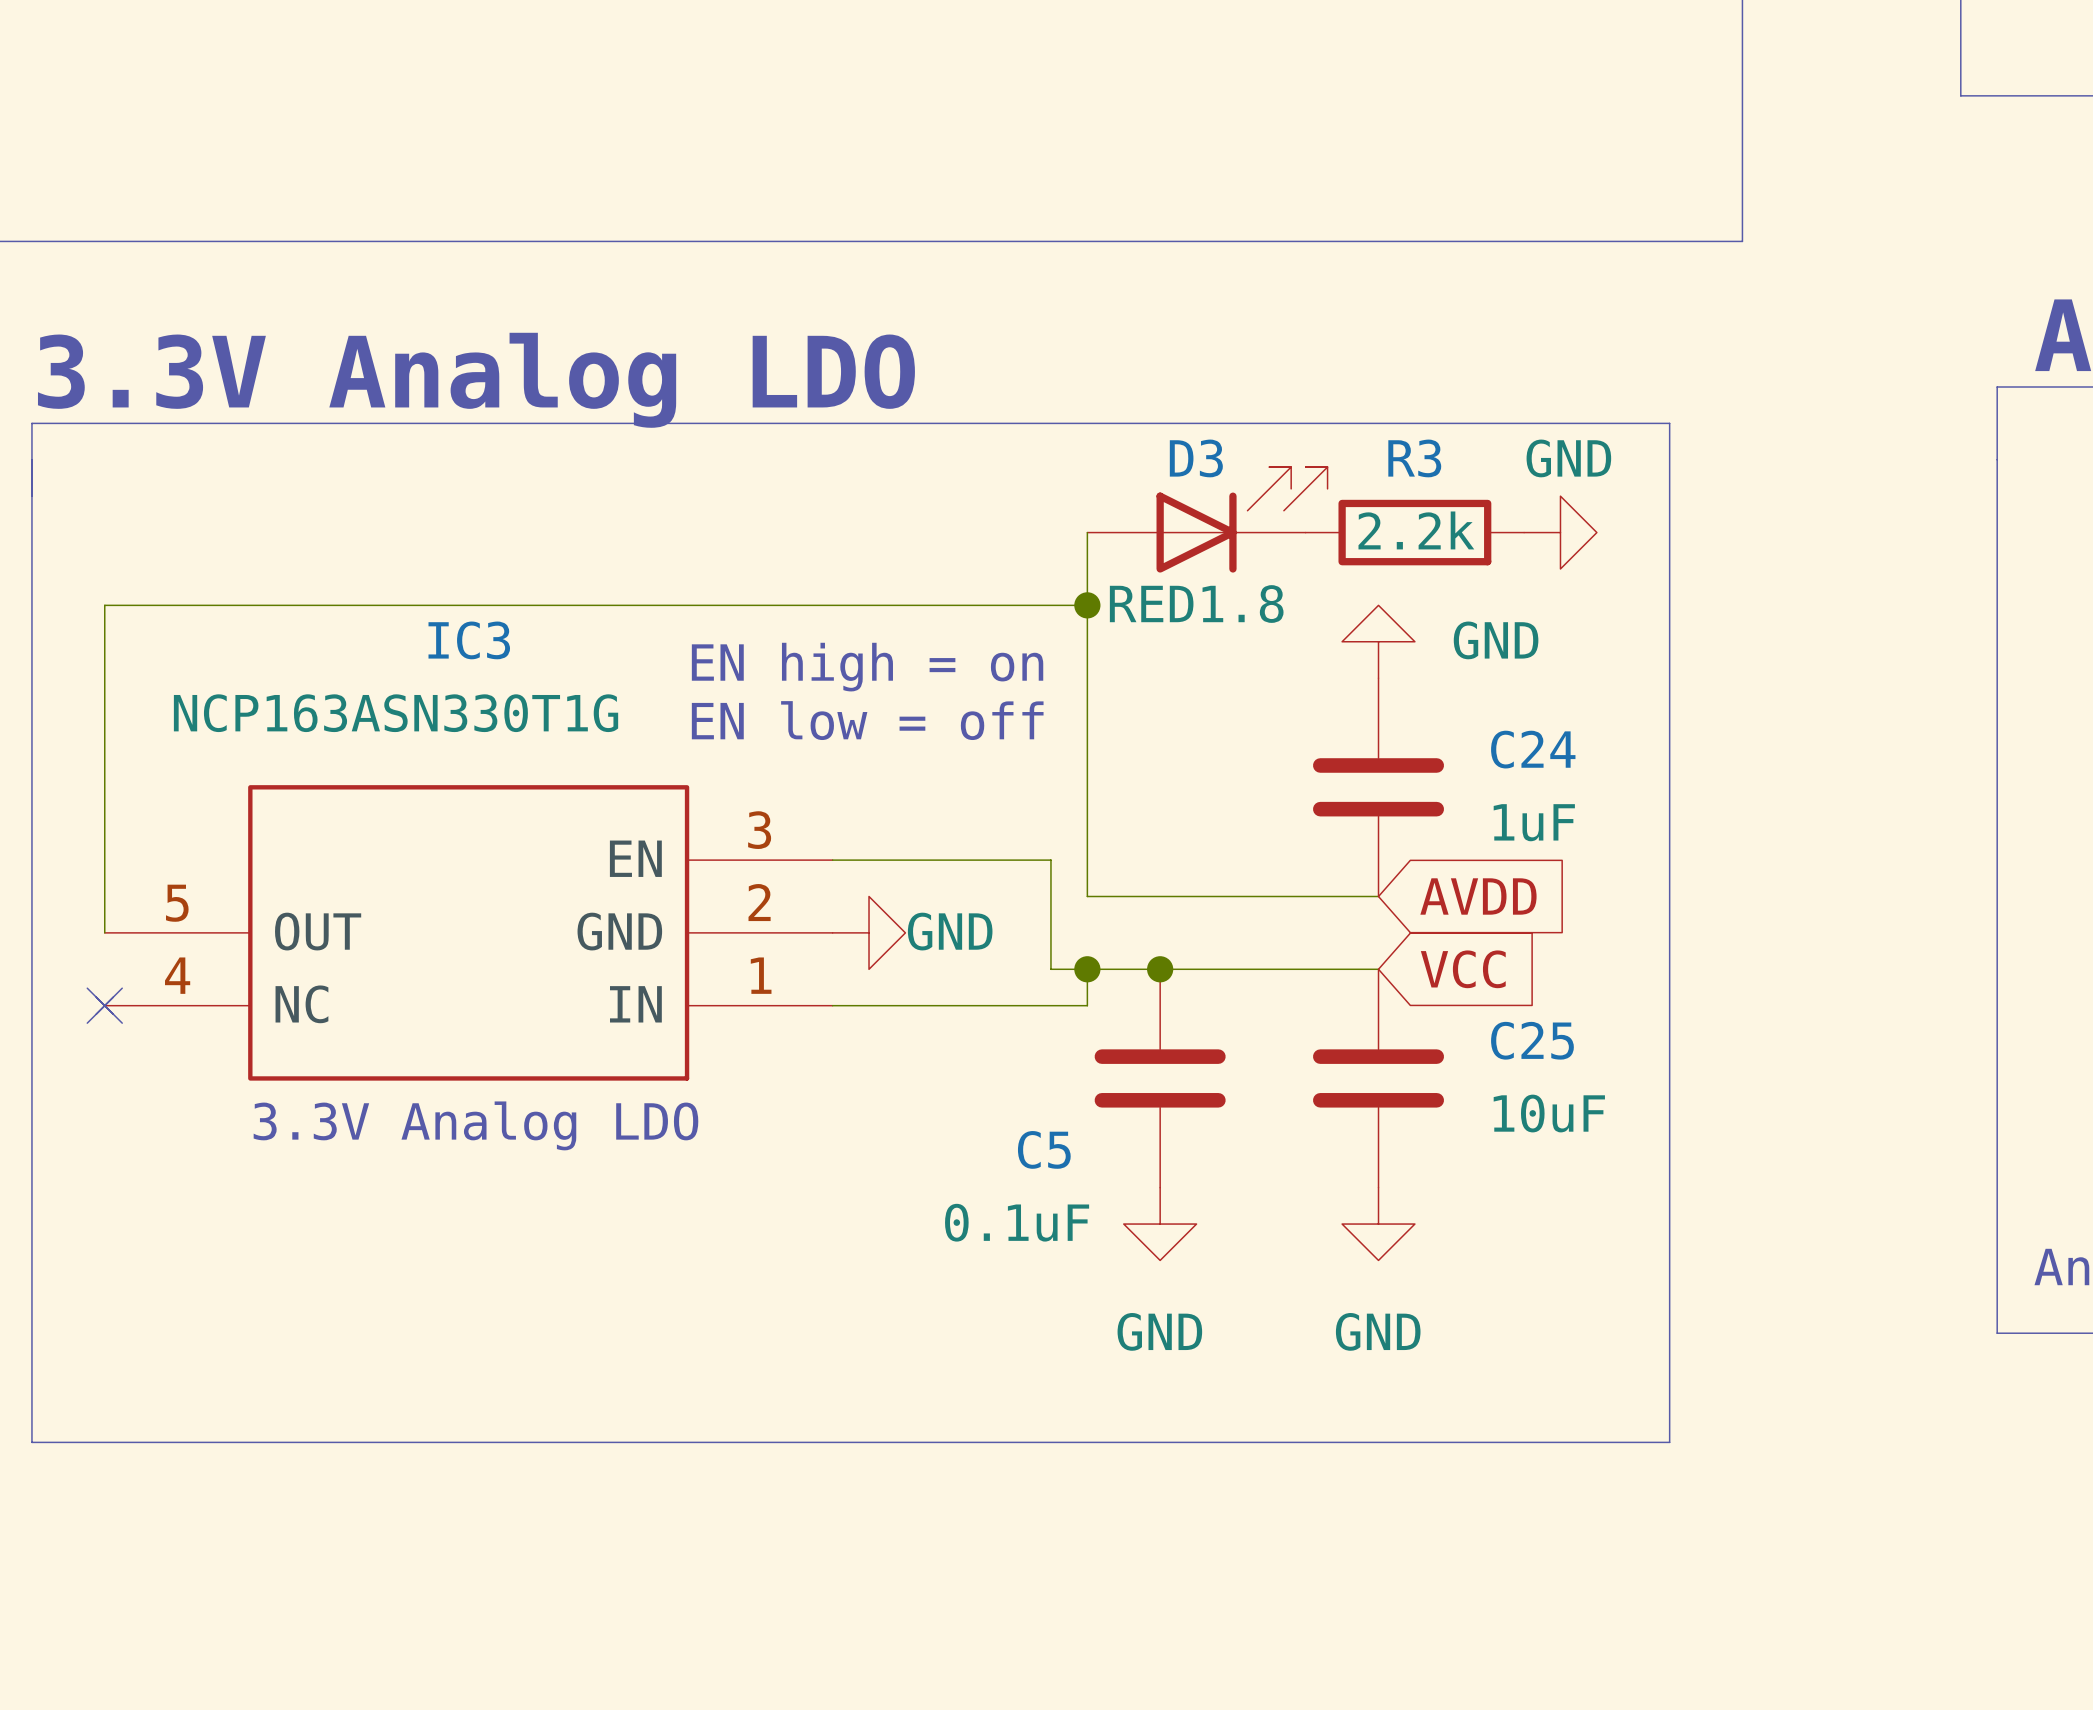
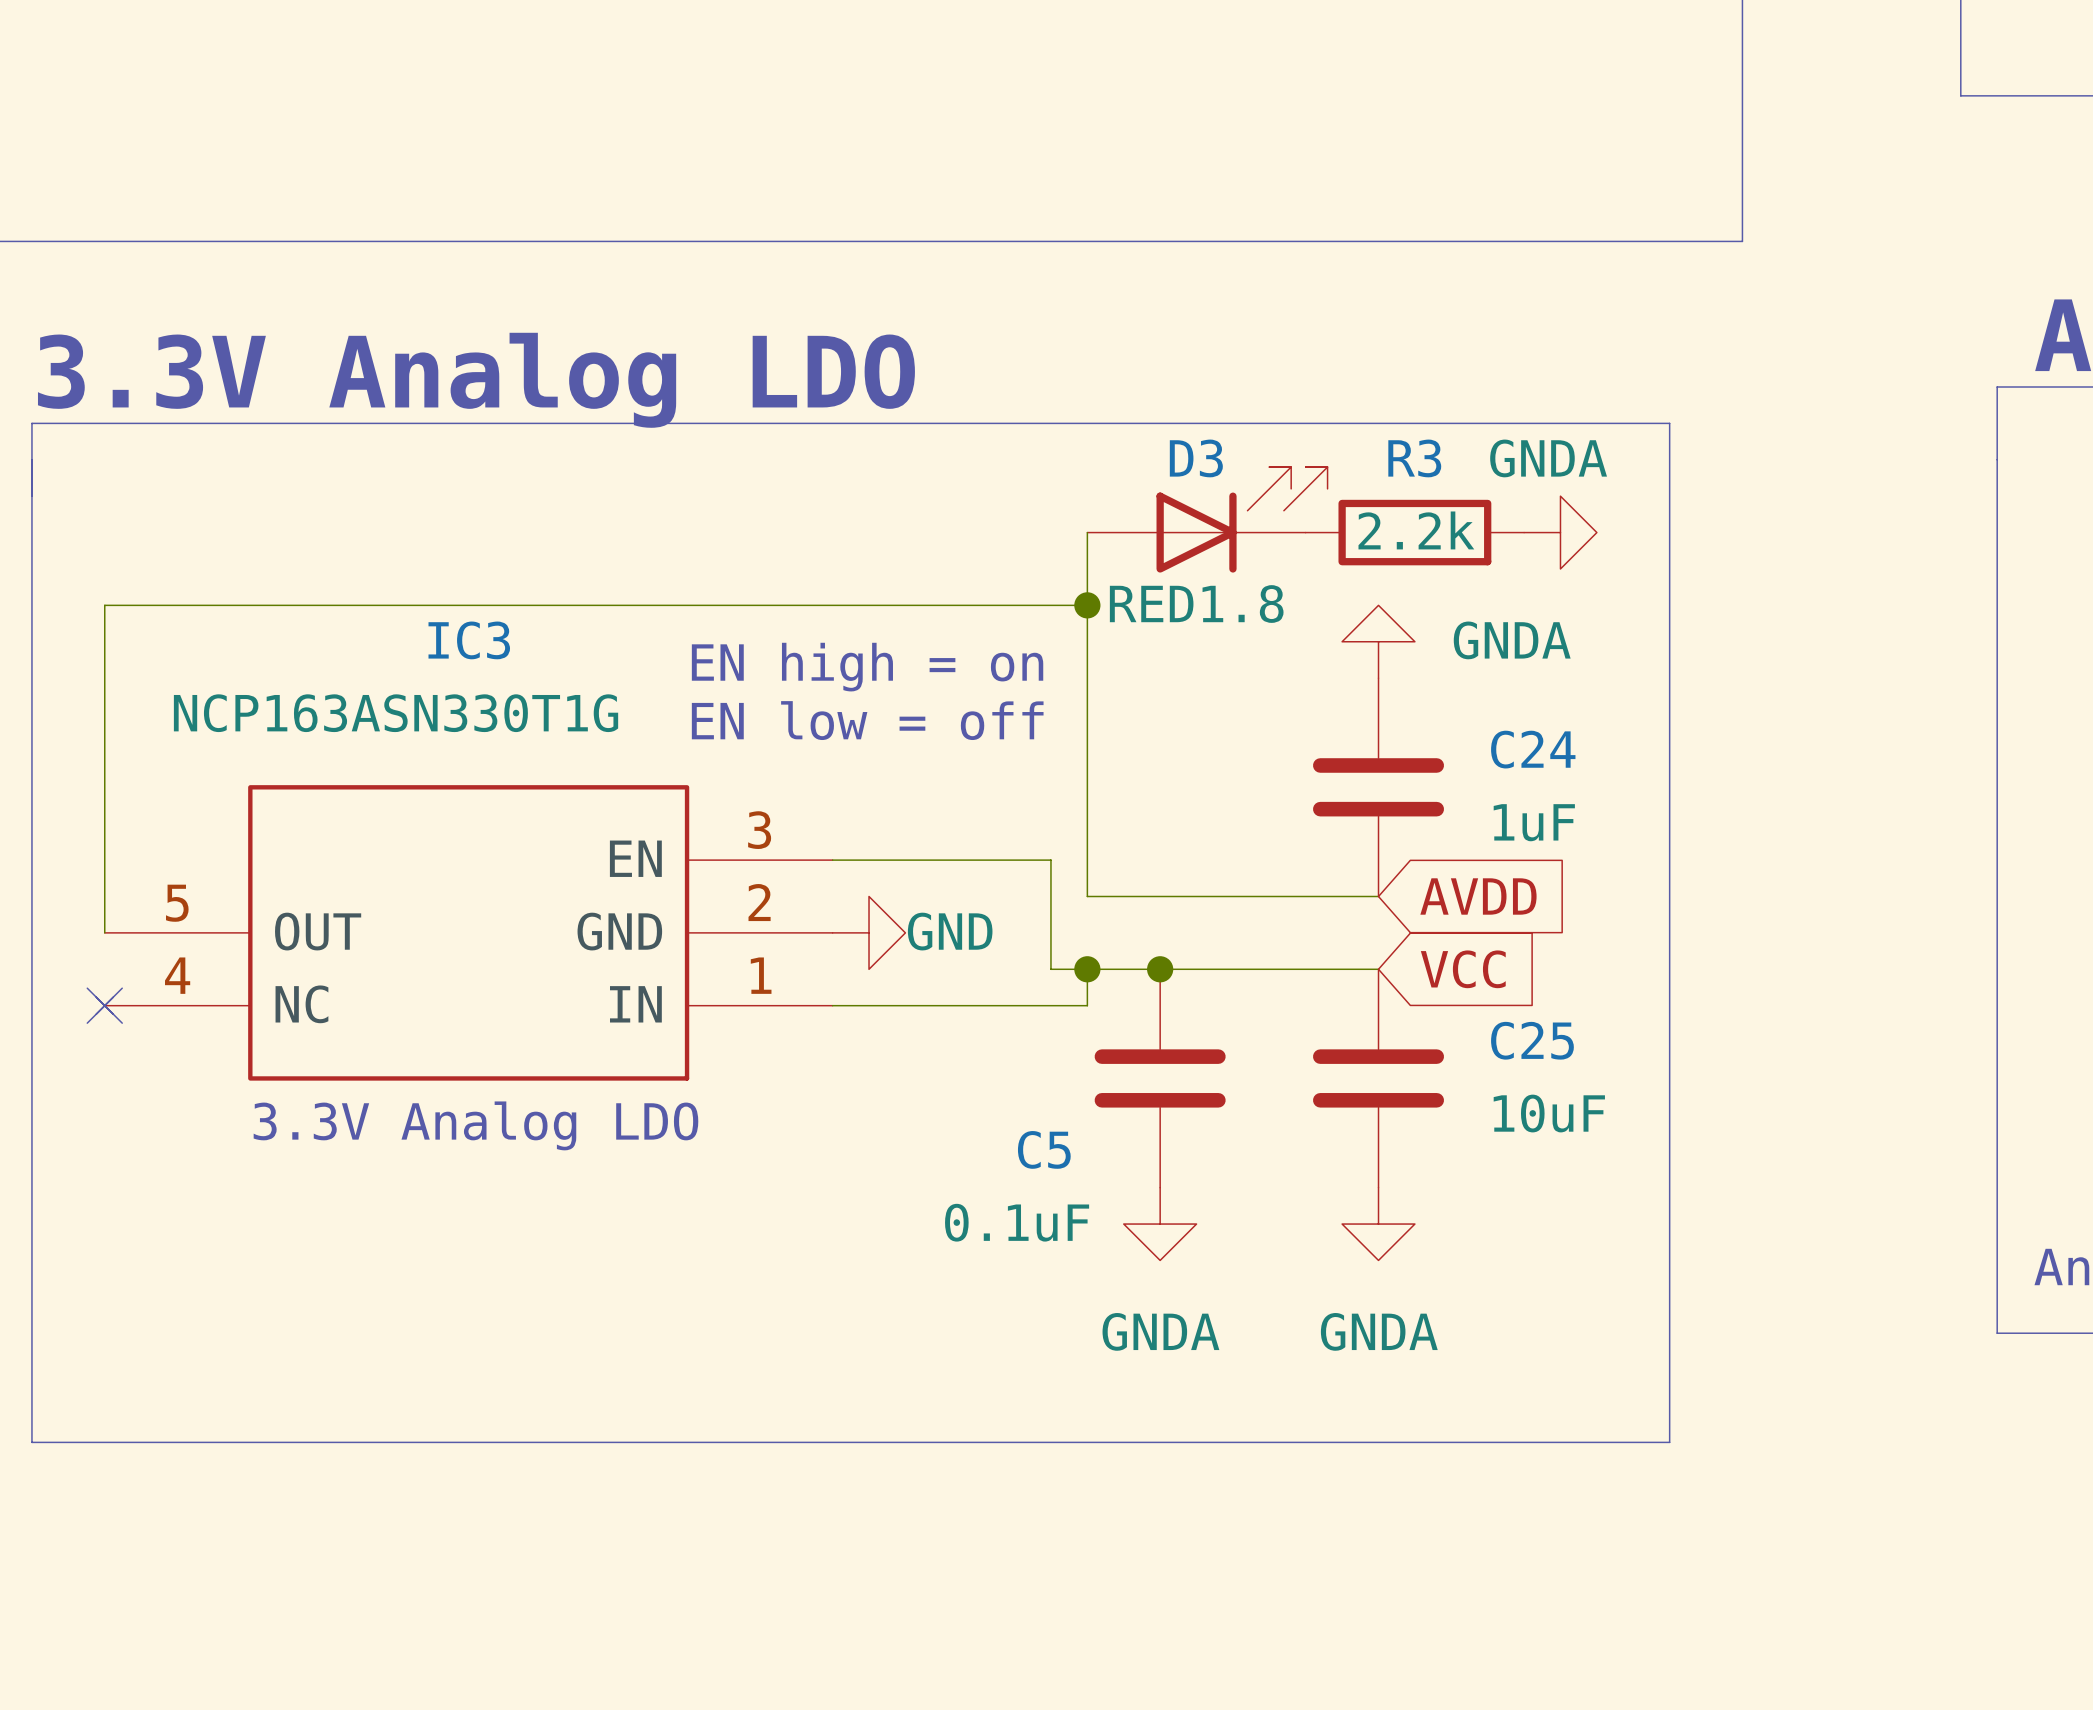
power symbol: GND (1560, 532) -> GNDA (1560, 532)
power symbol: GND (1378, 641) -> GNDA (1378, 641)
power symbol: GND (1160, 1224) -> GNDA (1160, 1224)
power symbol: GND (1378, 1224) -> GNDA (1378, 1224)

